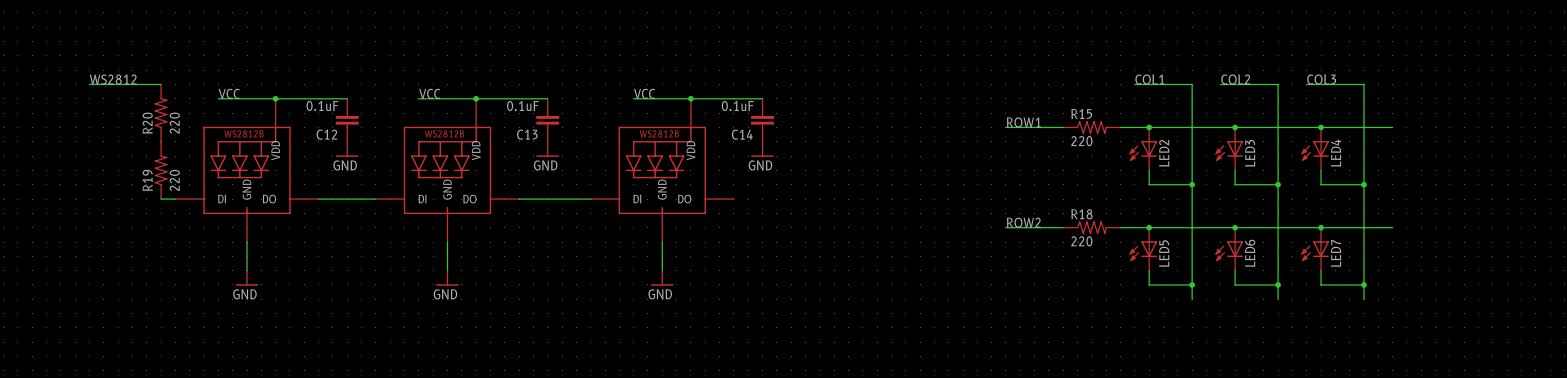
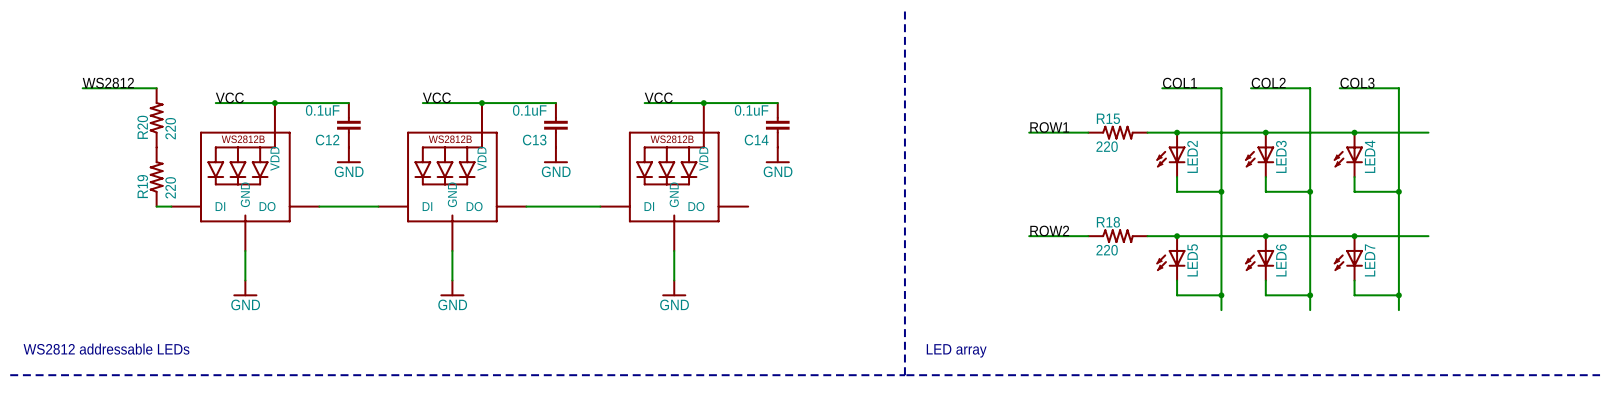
line: none -> (904, 8) (904, 375) (10, 375)
text: none -> WS2812 addressable LEDs (106, 349)
text: none -> LED array (956, 350)
line: none -> (906, 375) (1600, 375)

